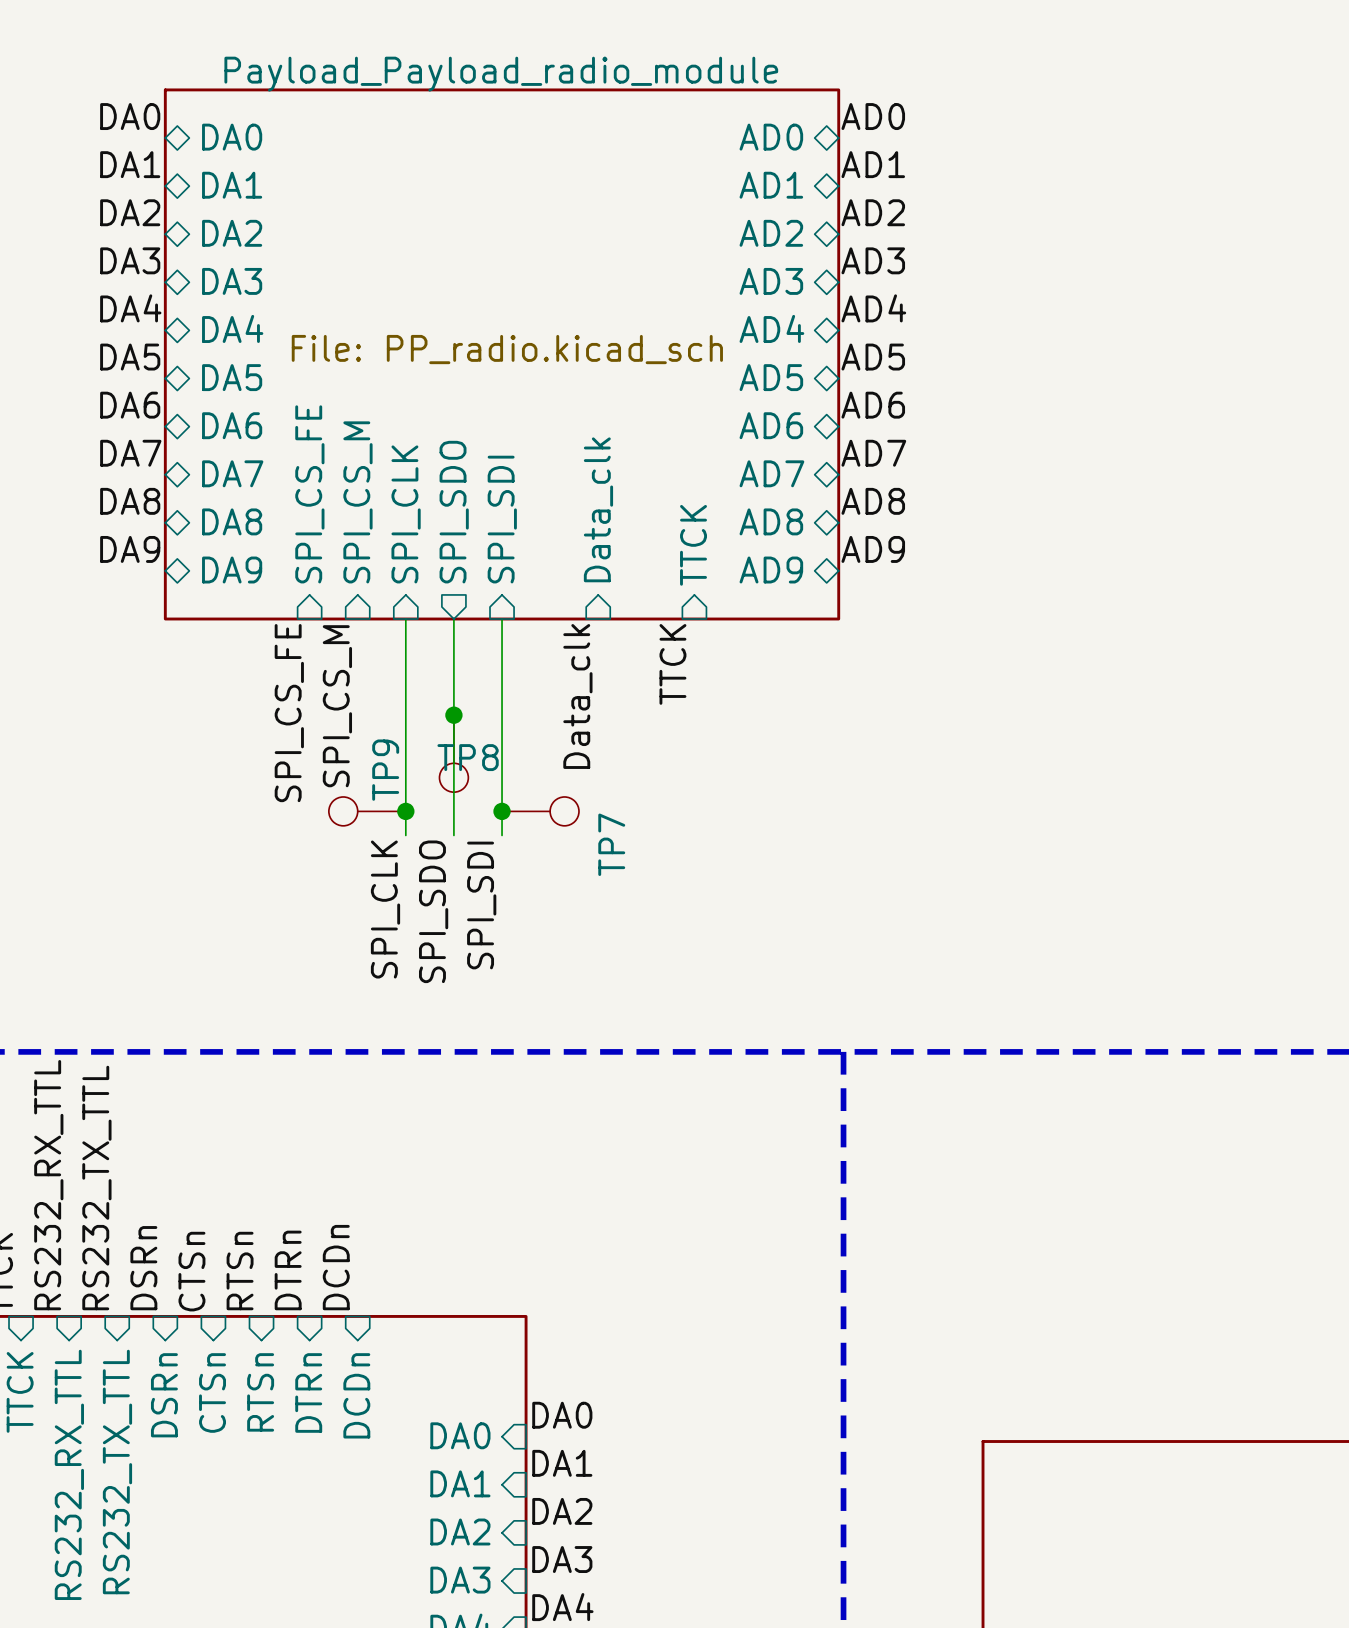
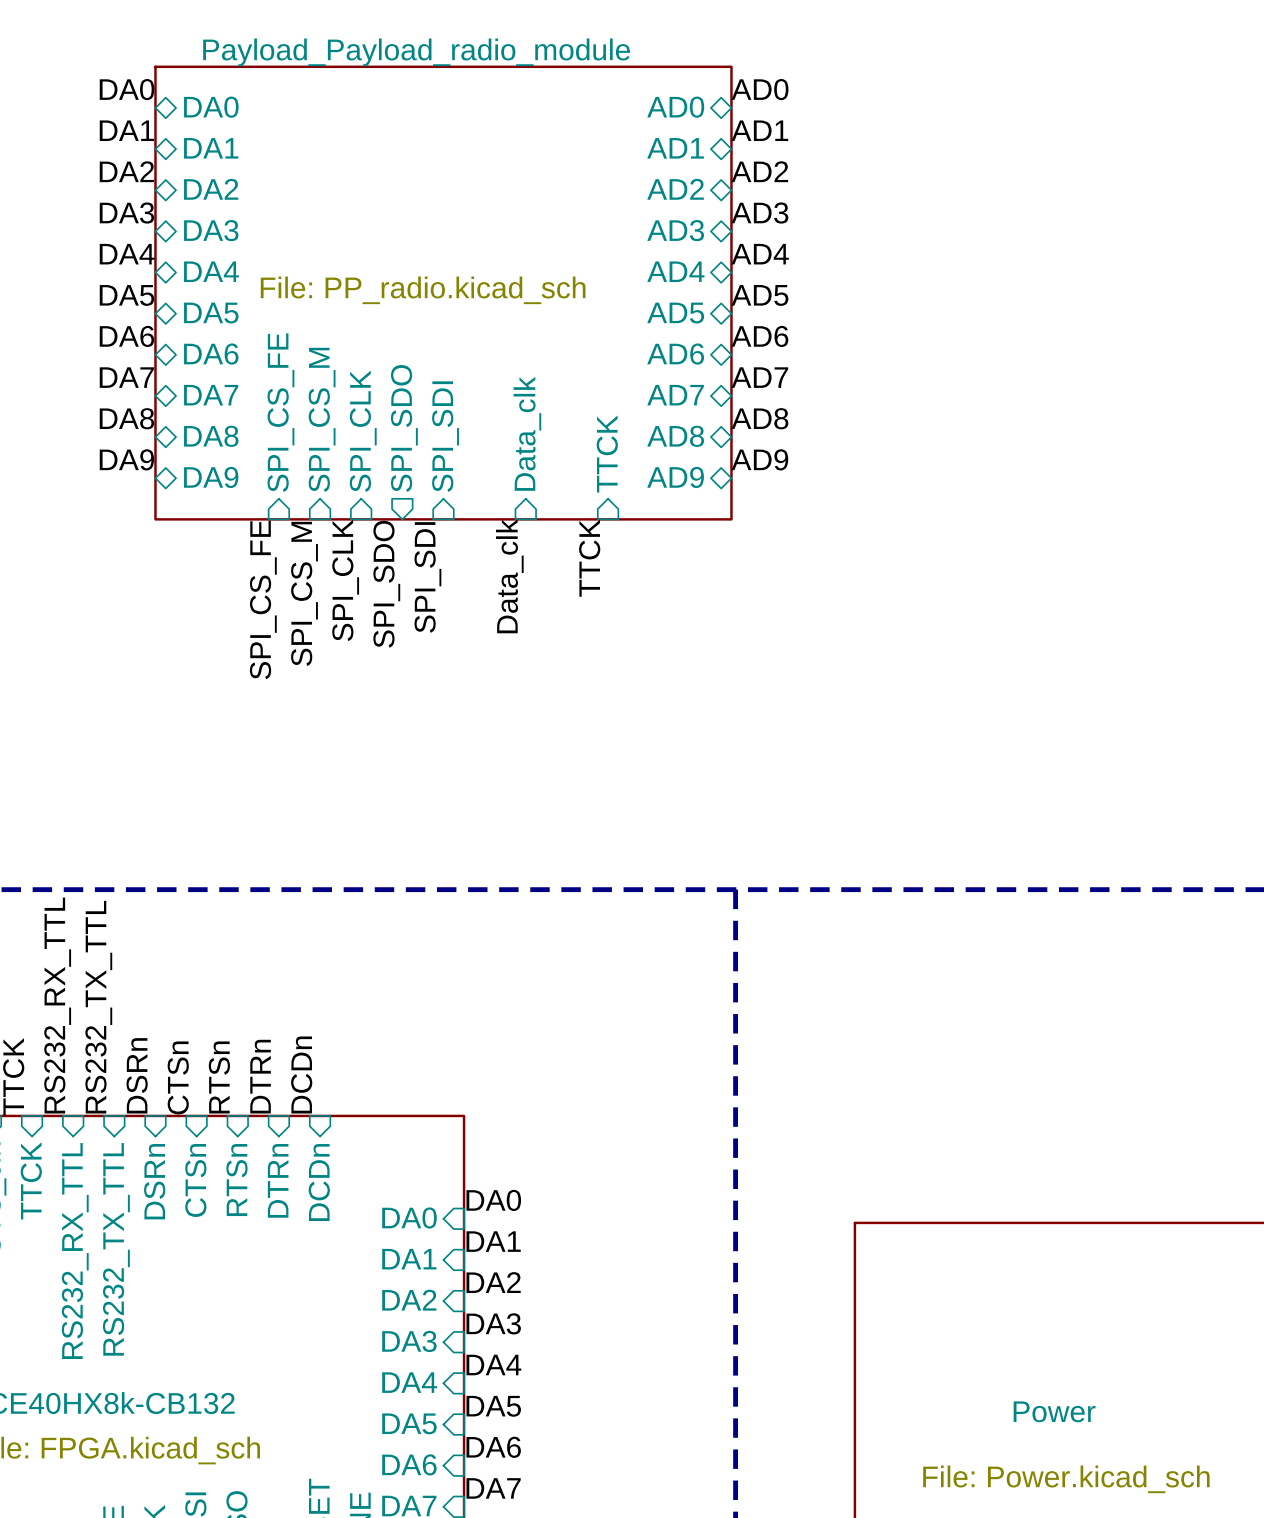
wire: (405, 619) (405, 835) -> none
wire: (453, 619) (453, 835) -> none
wire: (502, 619) (502, 835) -> none
junction: (453, 715) -> none
TP8: (453, 753) -> none
TP9: (367, 811) -> none
junction: (405, 811) -> none
junction: (502, 811) -> none
TP7: (540, 811) -> none
label position: SPI_SDI (481, 905) -> SPI_SDI (427, 577)
label position: SPI_CLK (385, 909) -> SPI_CLK (345, 580)
label position: SPI_SDO (433, 911) -> SPI_SDO (386, 584)

